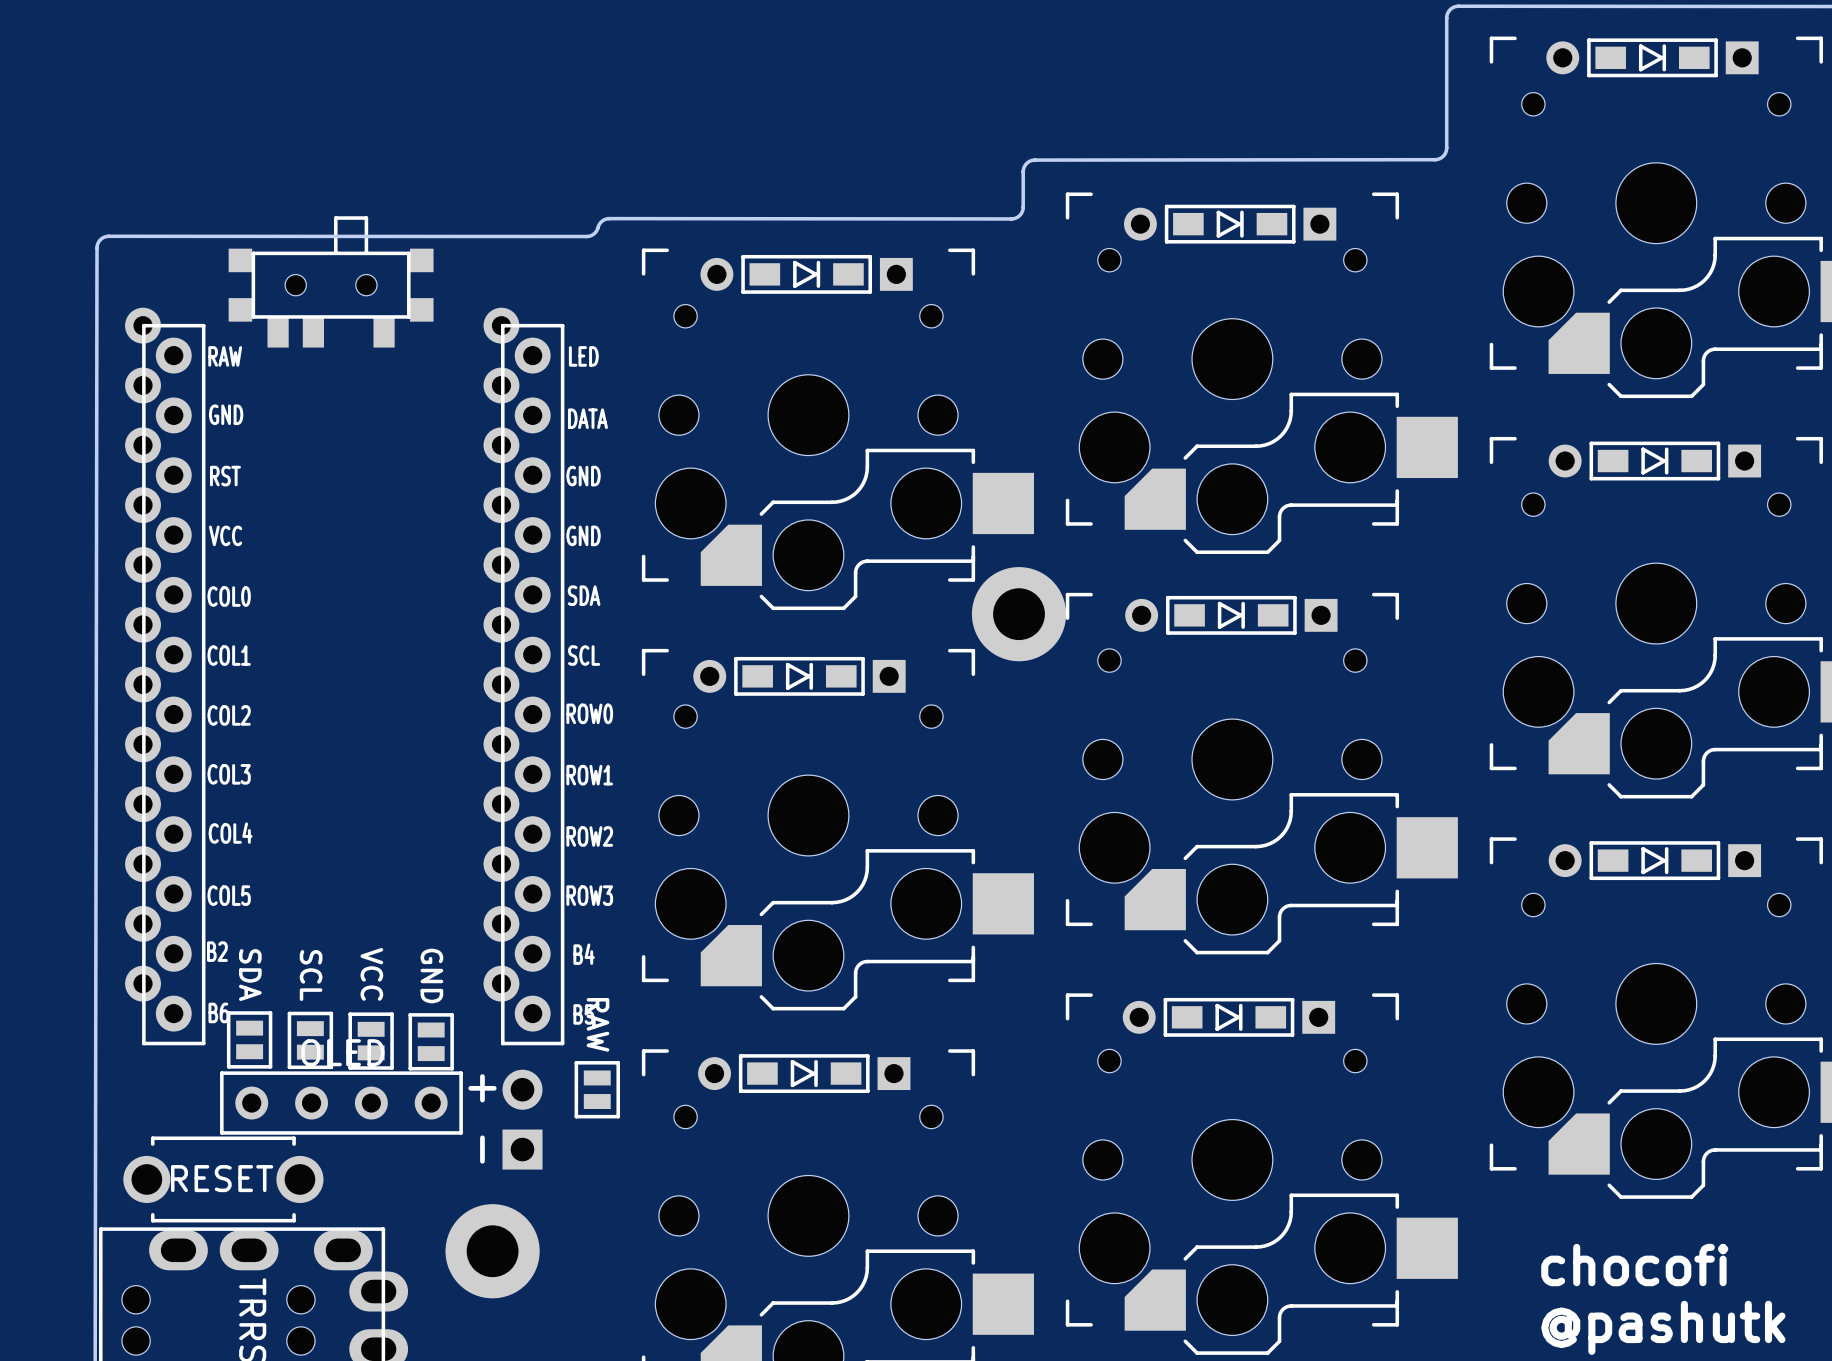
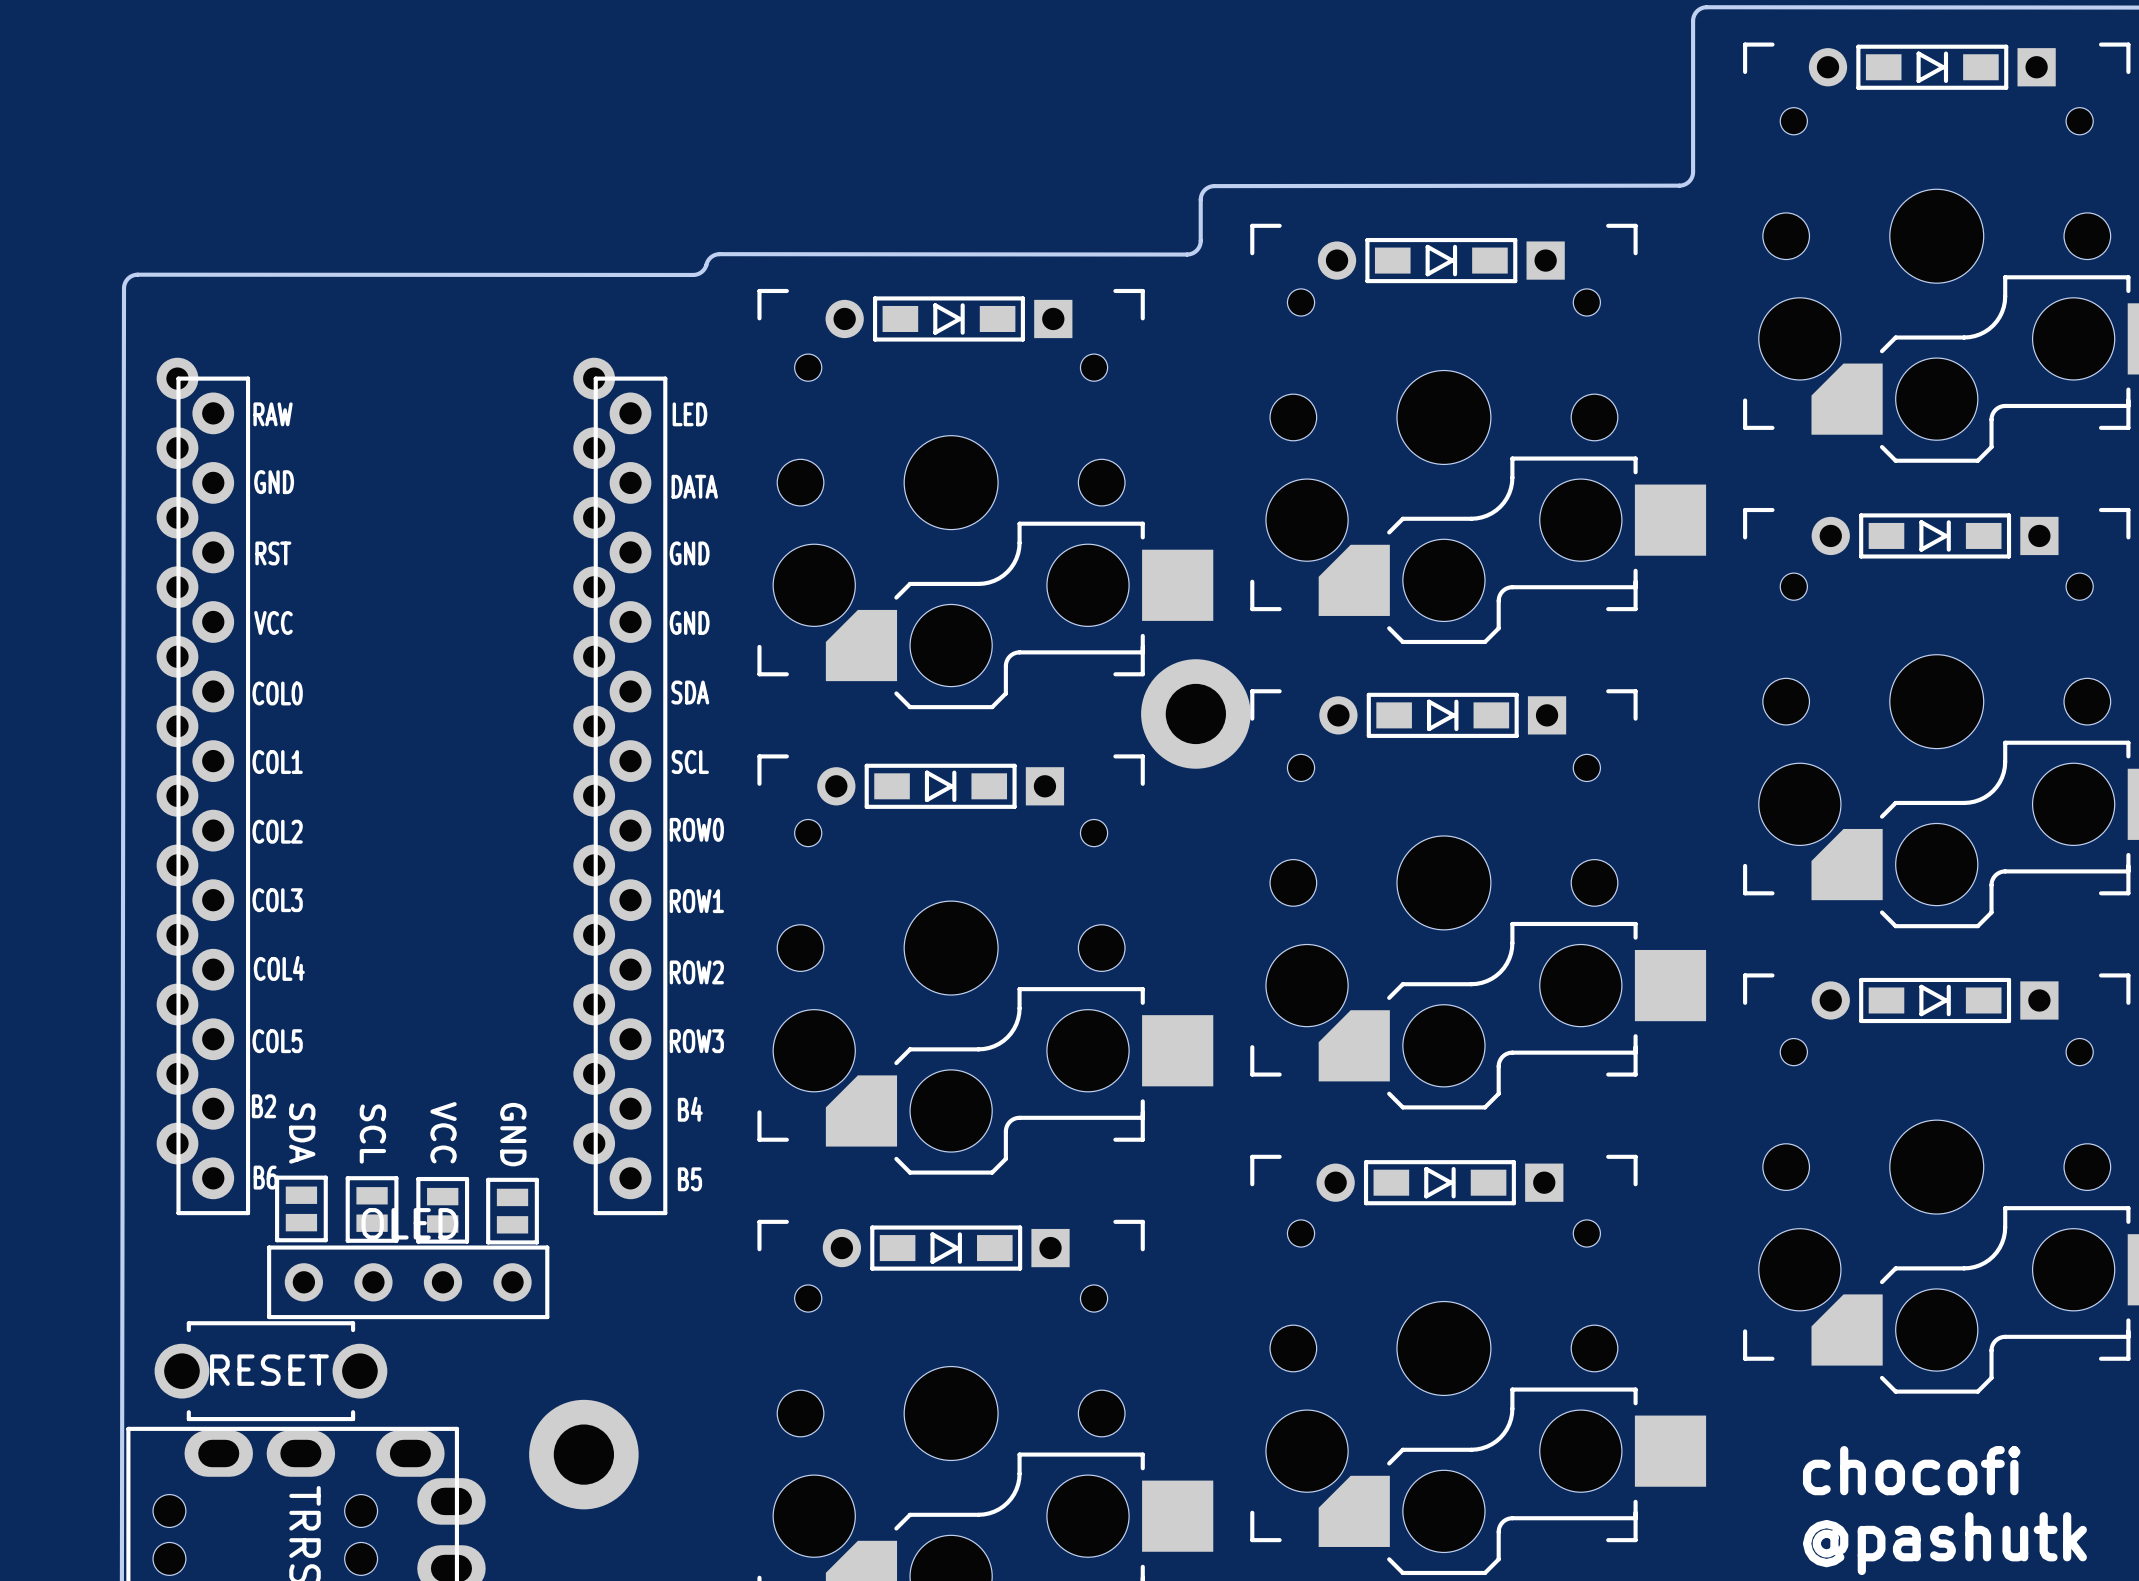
part: (331, 281) -> none
part: (331, 285) -> none
part: RAW (597, 1089) -> none
part: (505, 1119) -> none

